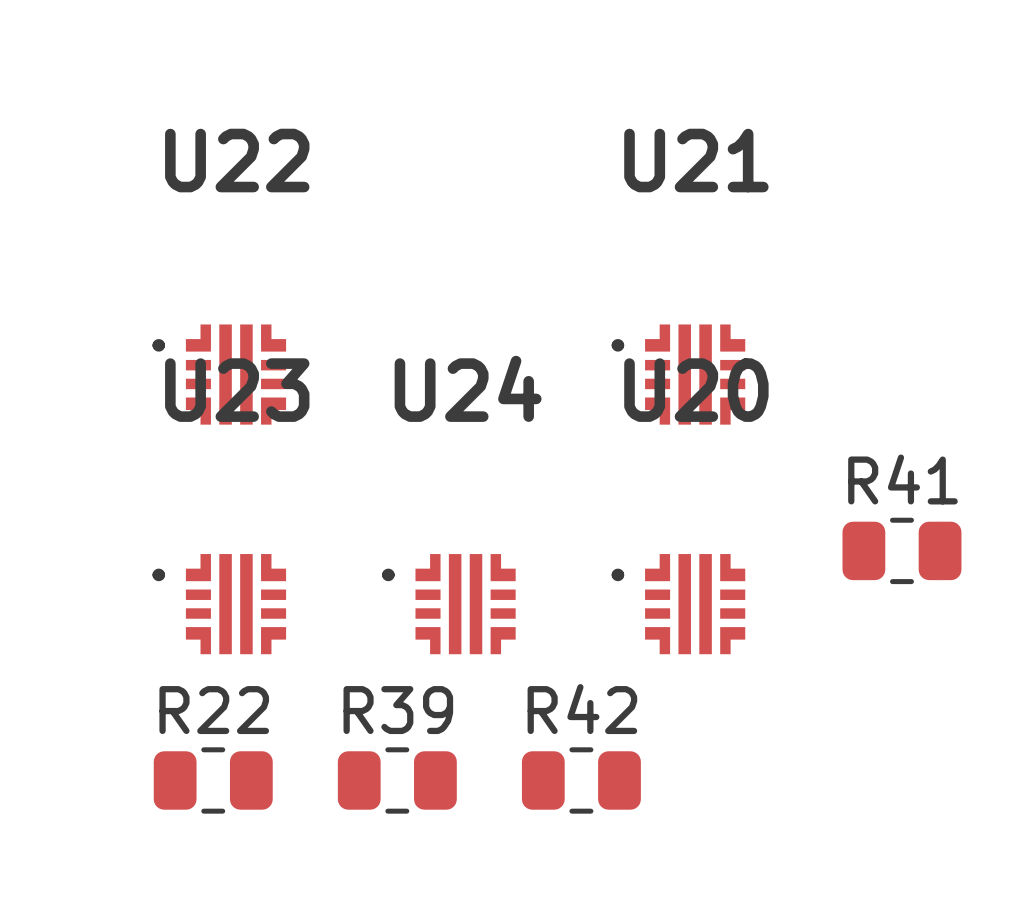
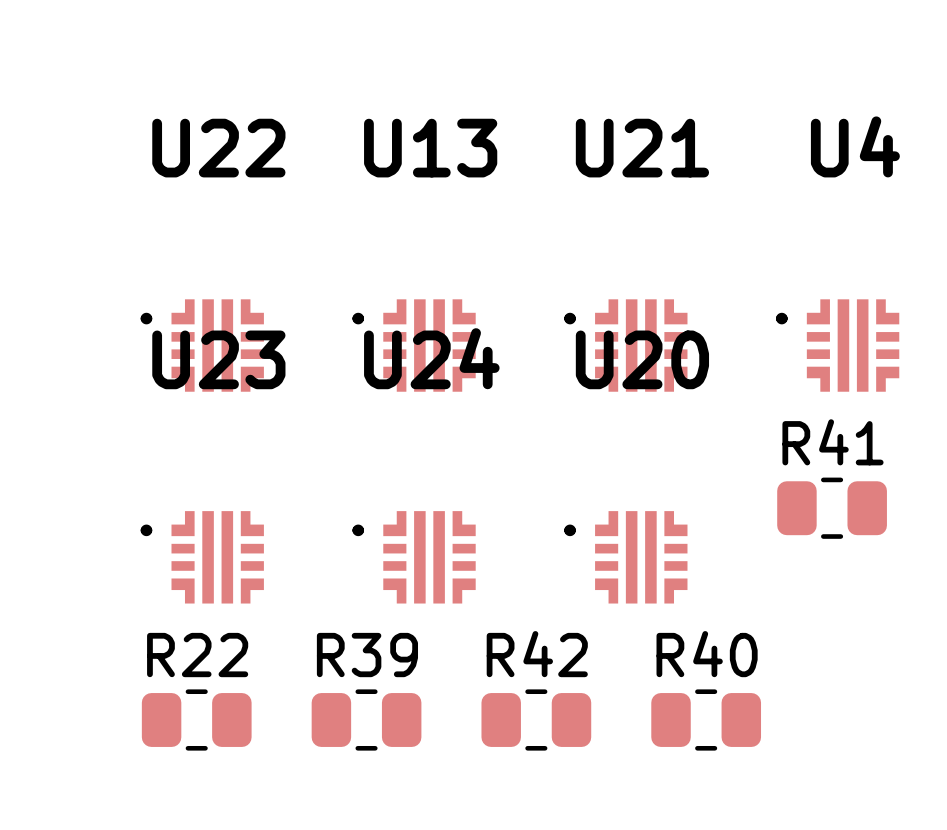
U13: none -> (414, 345)
U4: none -> (837, 345)
R40: none -> (706, 720)

